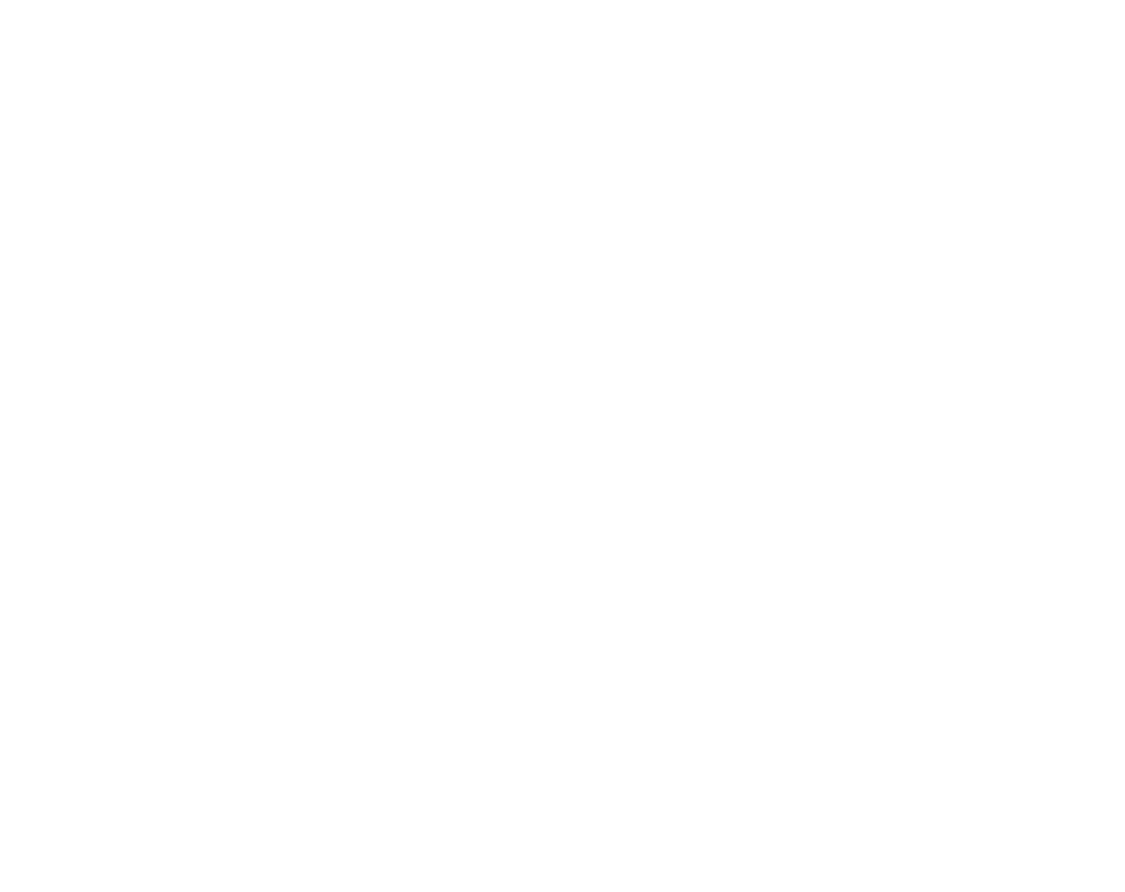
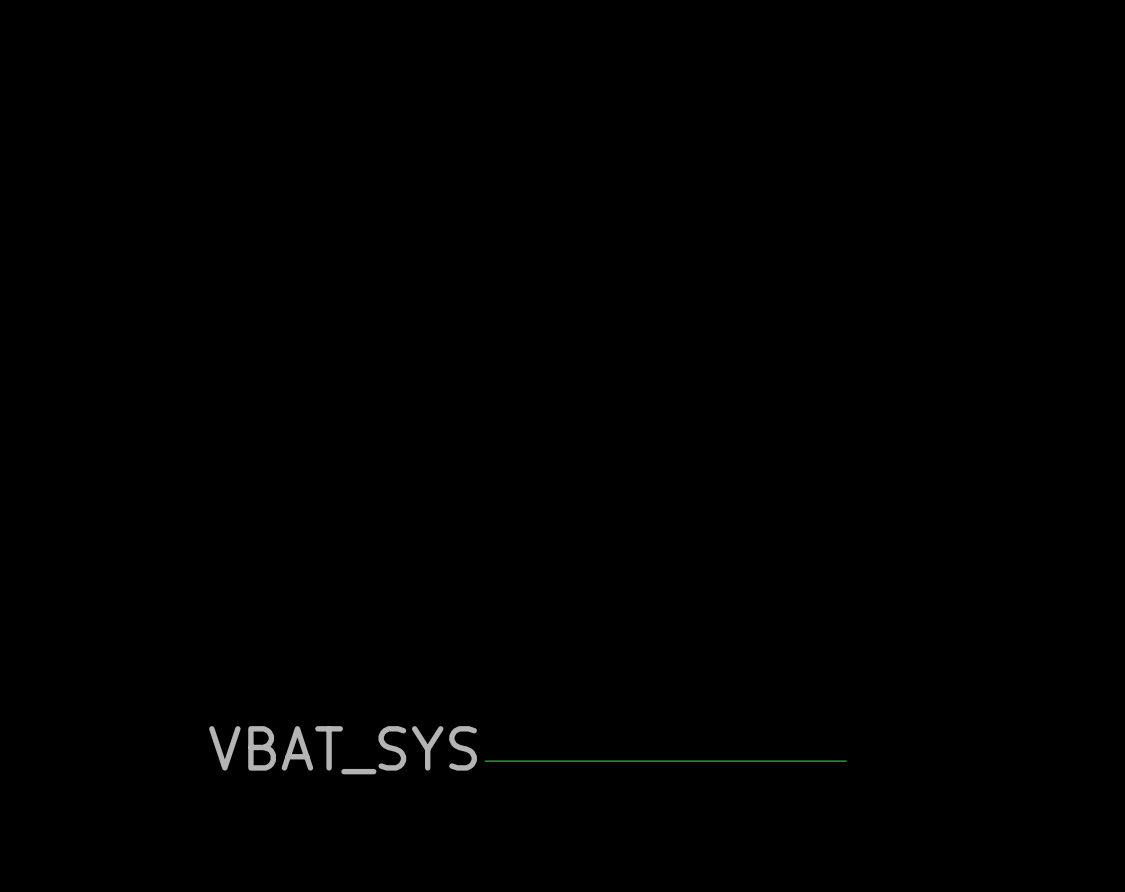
label: none -> VBAT_SYS (343, 750)
wire: none -> (485, 761) (846, 761)

